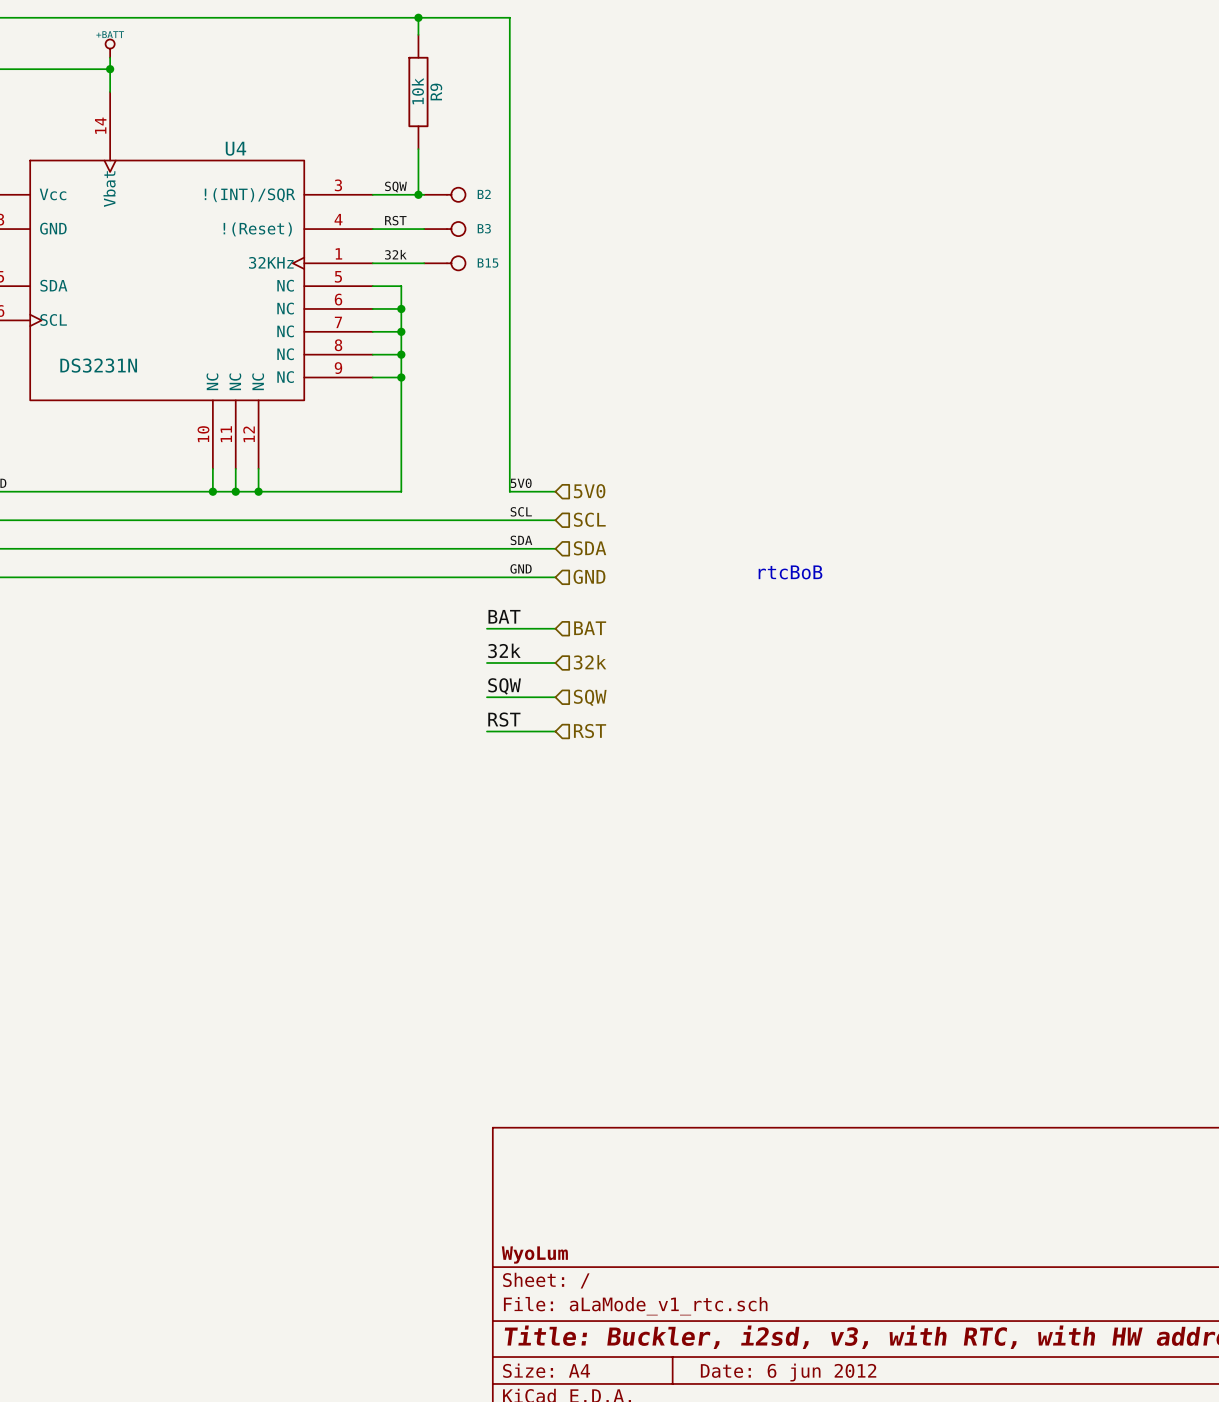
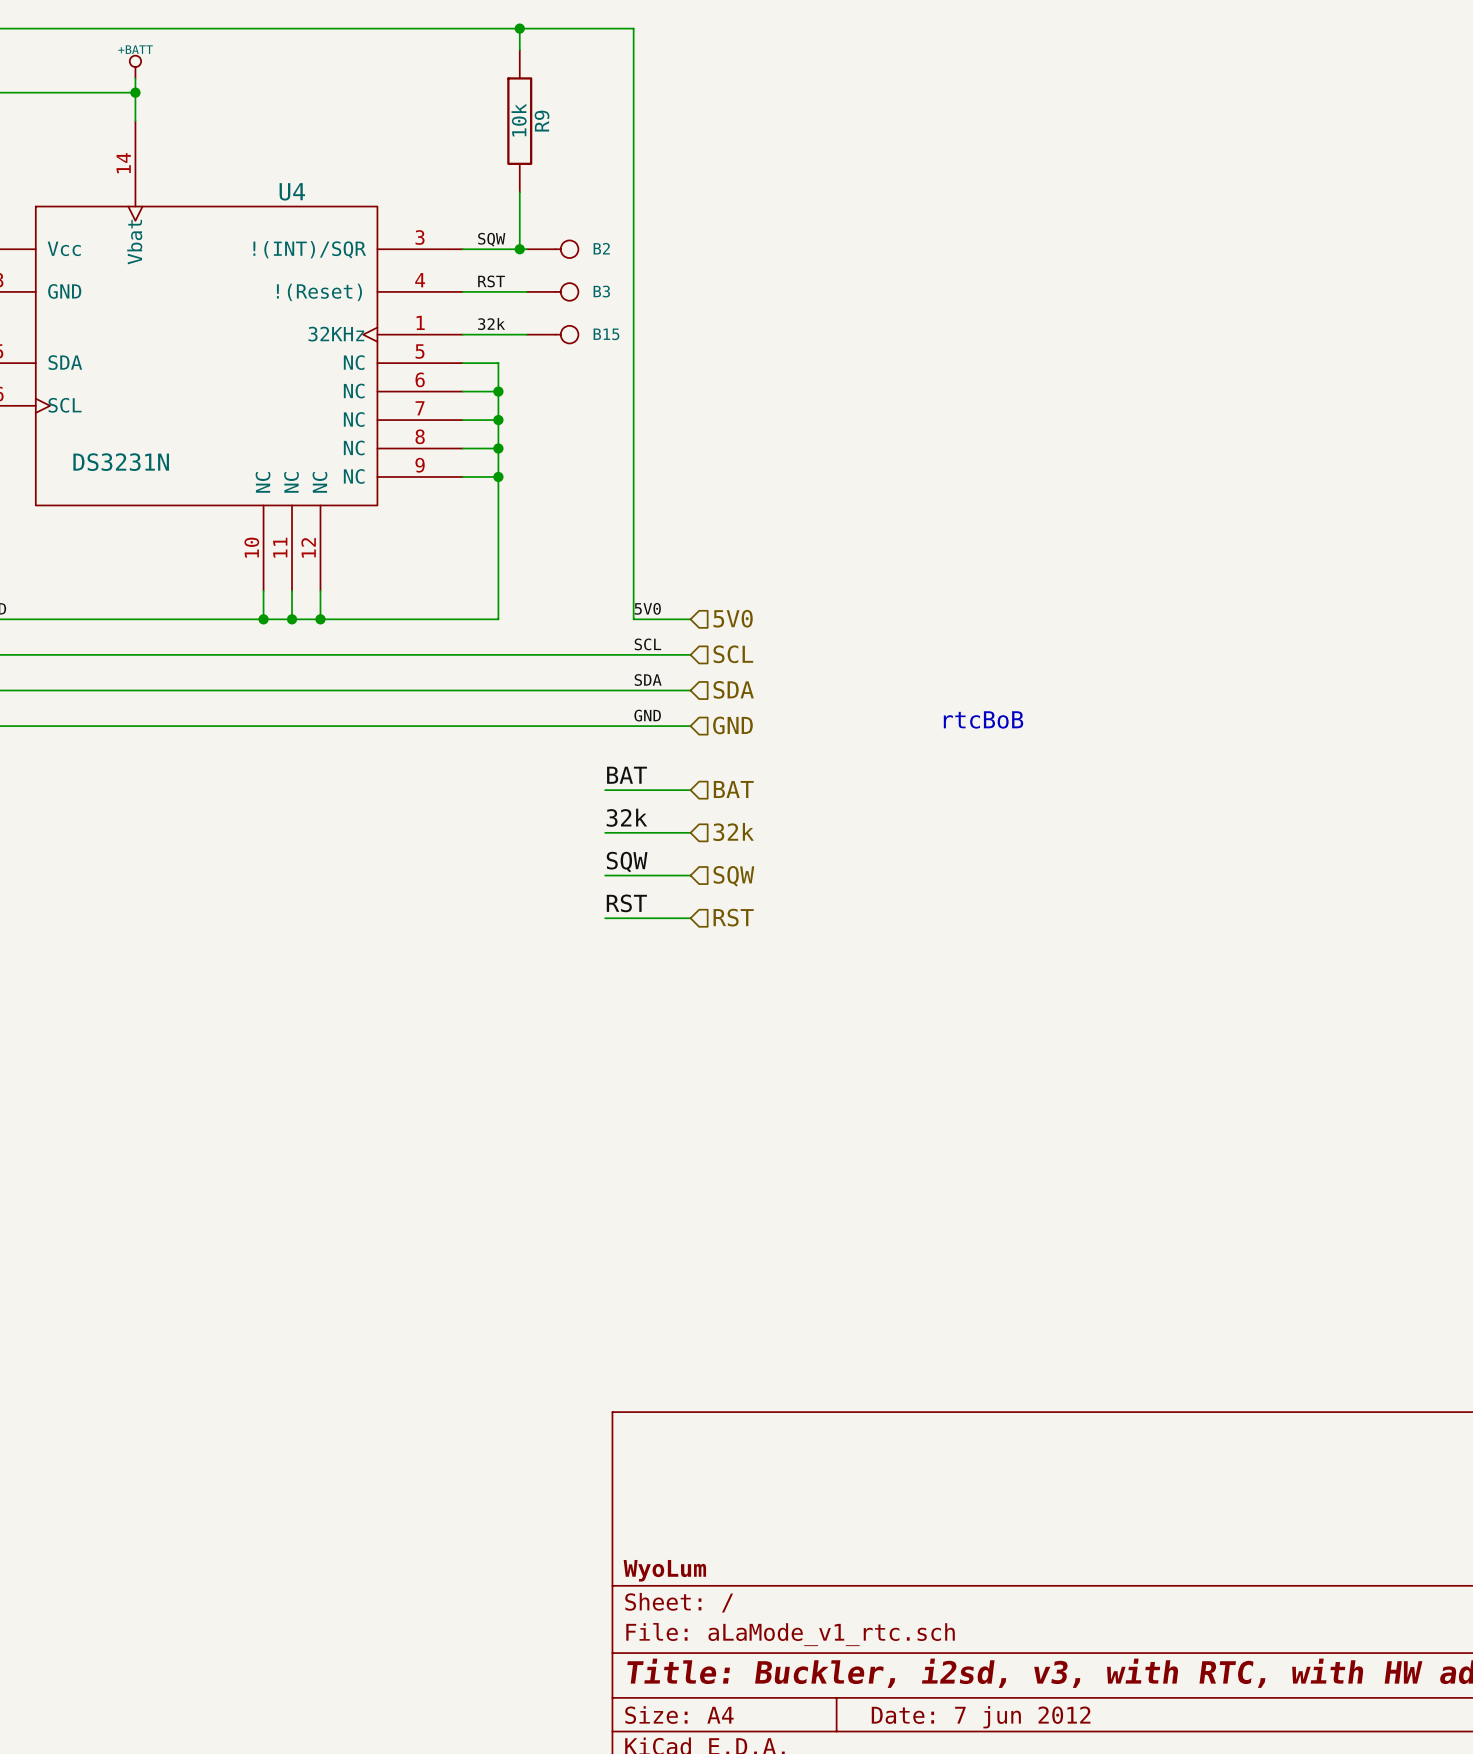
title block: Date: 6 jun 2012 (788, 1372) -> Date: 7 jun 2012 (981, 1717)

